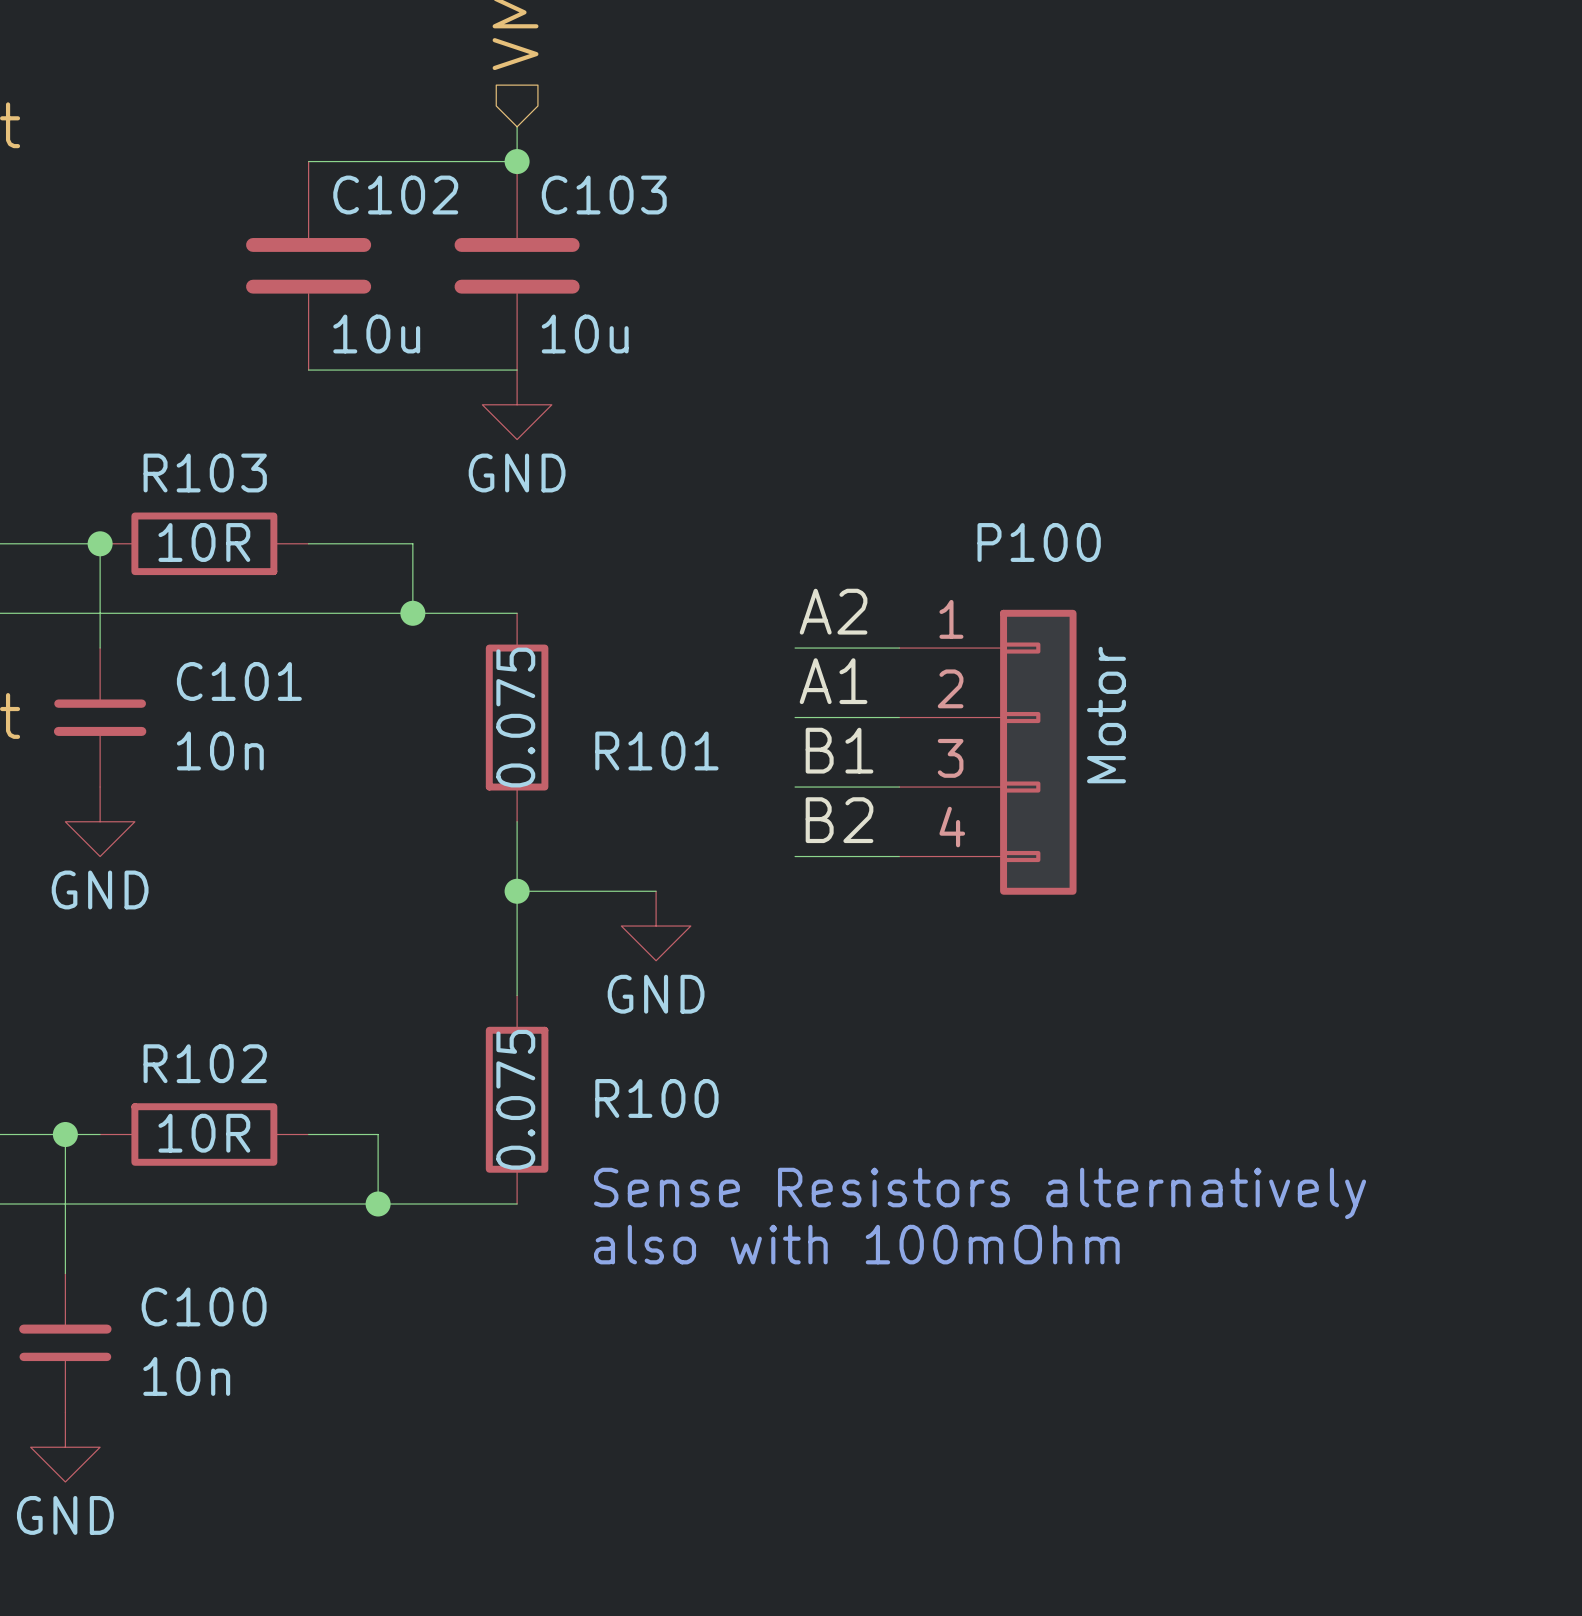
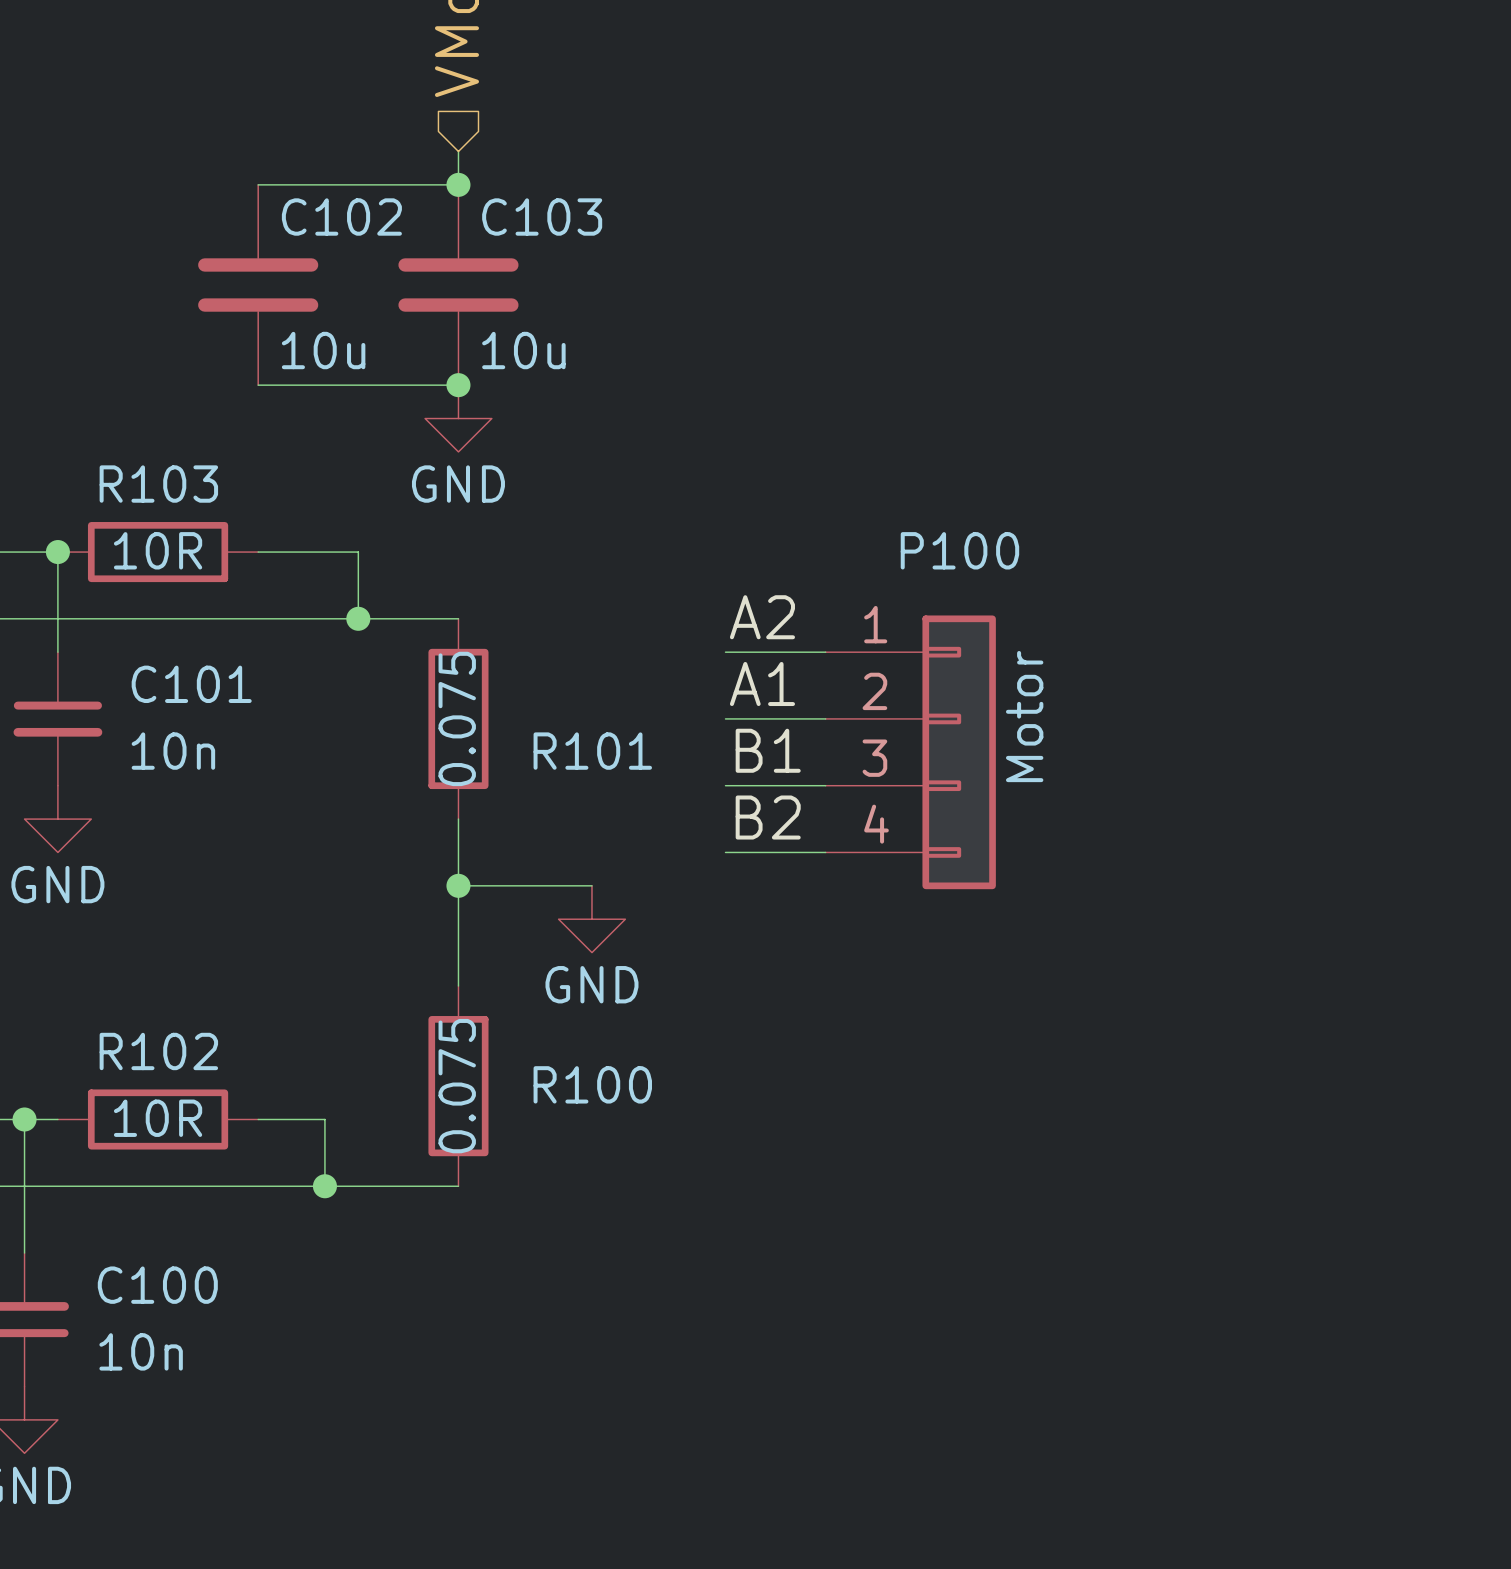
junction: none -> (458, 385)
text: Sense Resistors alternatively (980, 1193) -> none
text: also with 100mOhm (856, 1244) -> none

